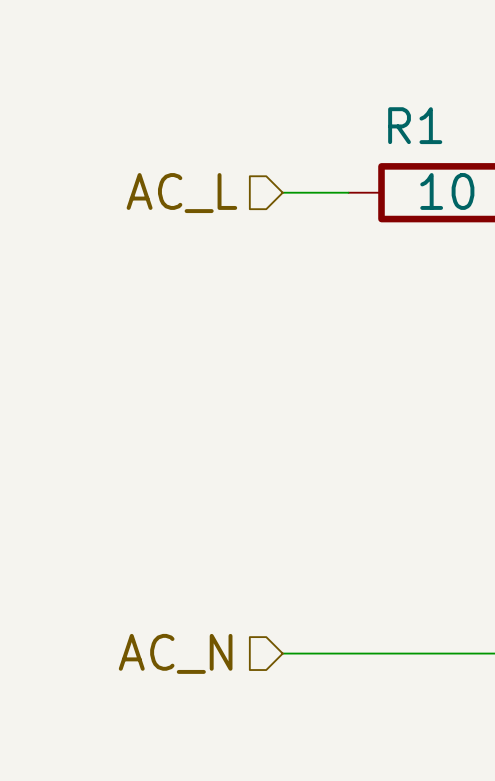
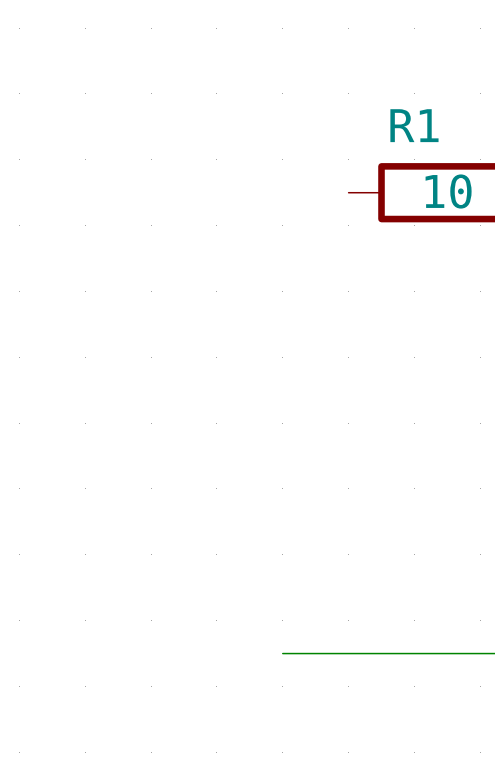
wire: (282, 192) (348, 192) -> none
hierarchical label: AC_L (181, 193) -> none
hierarchical label: AC_N (175, 653) -> none

